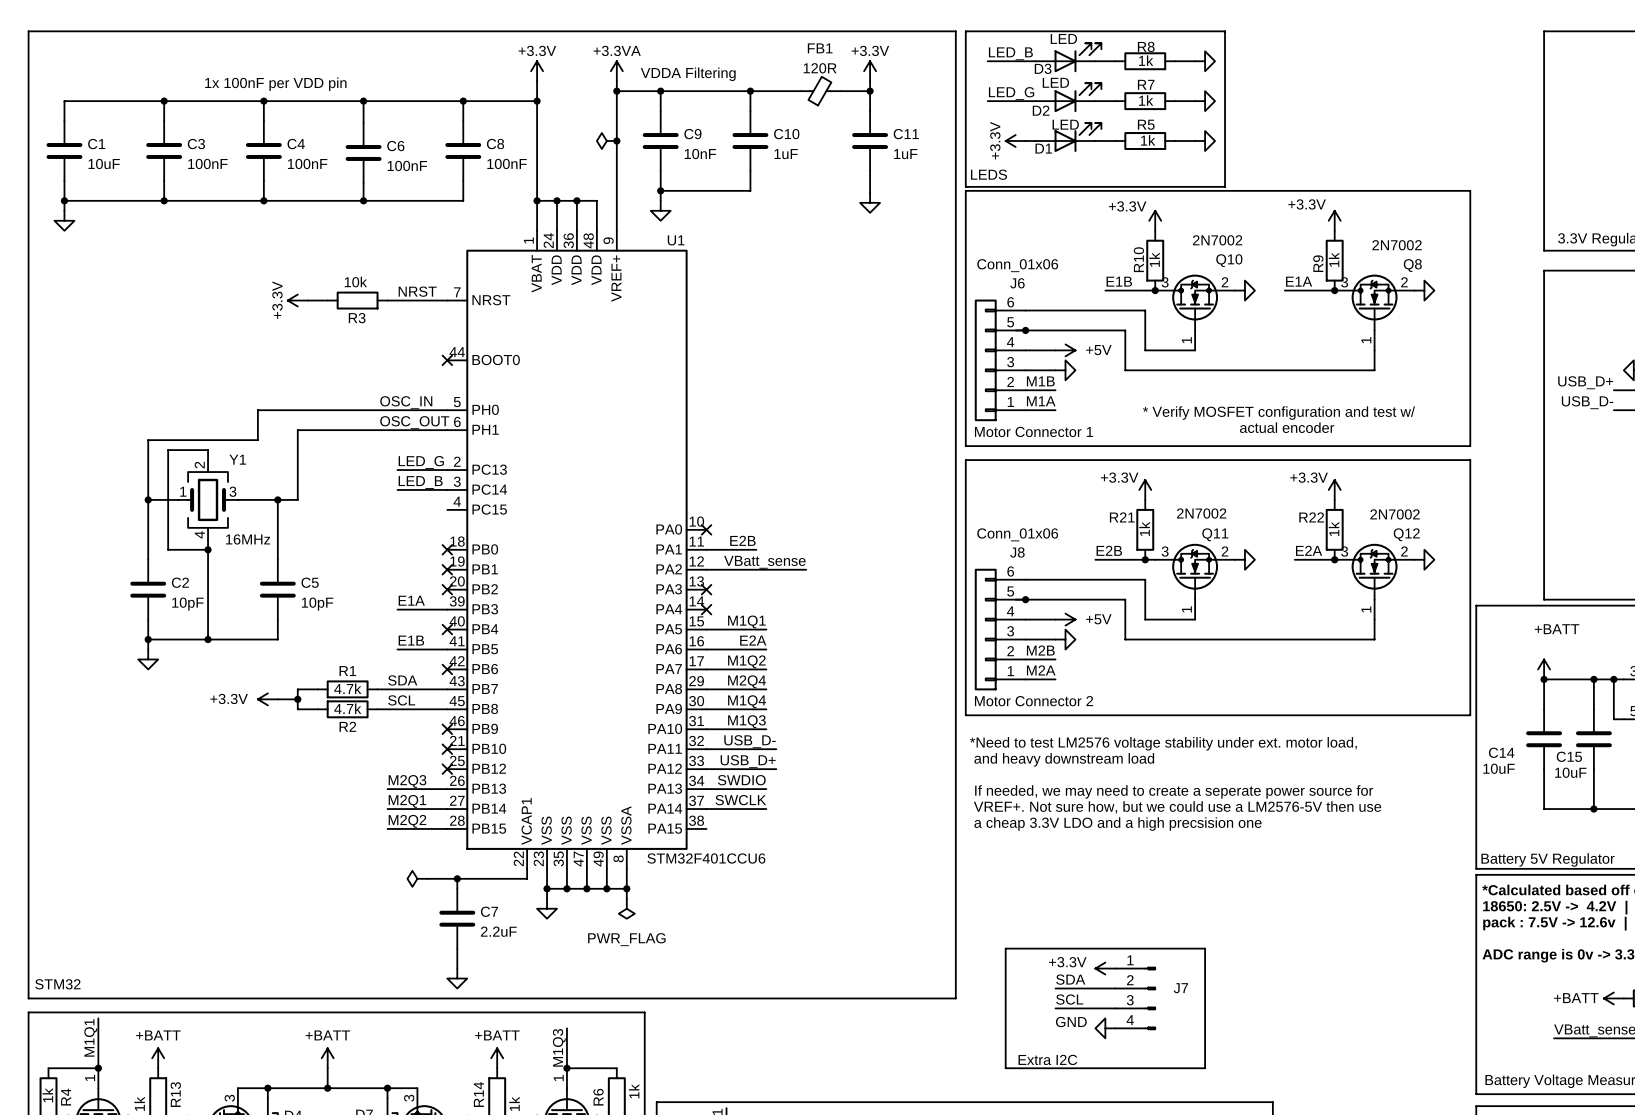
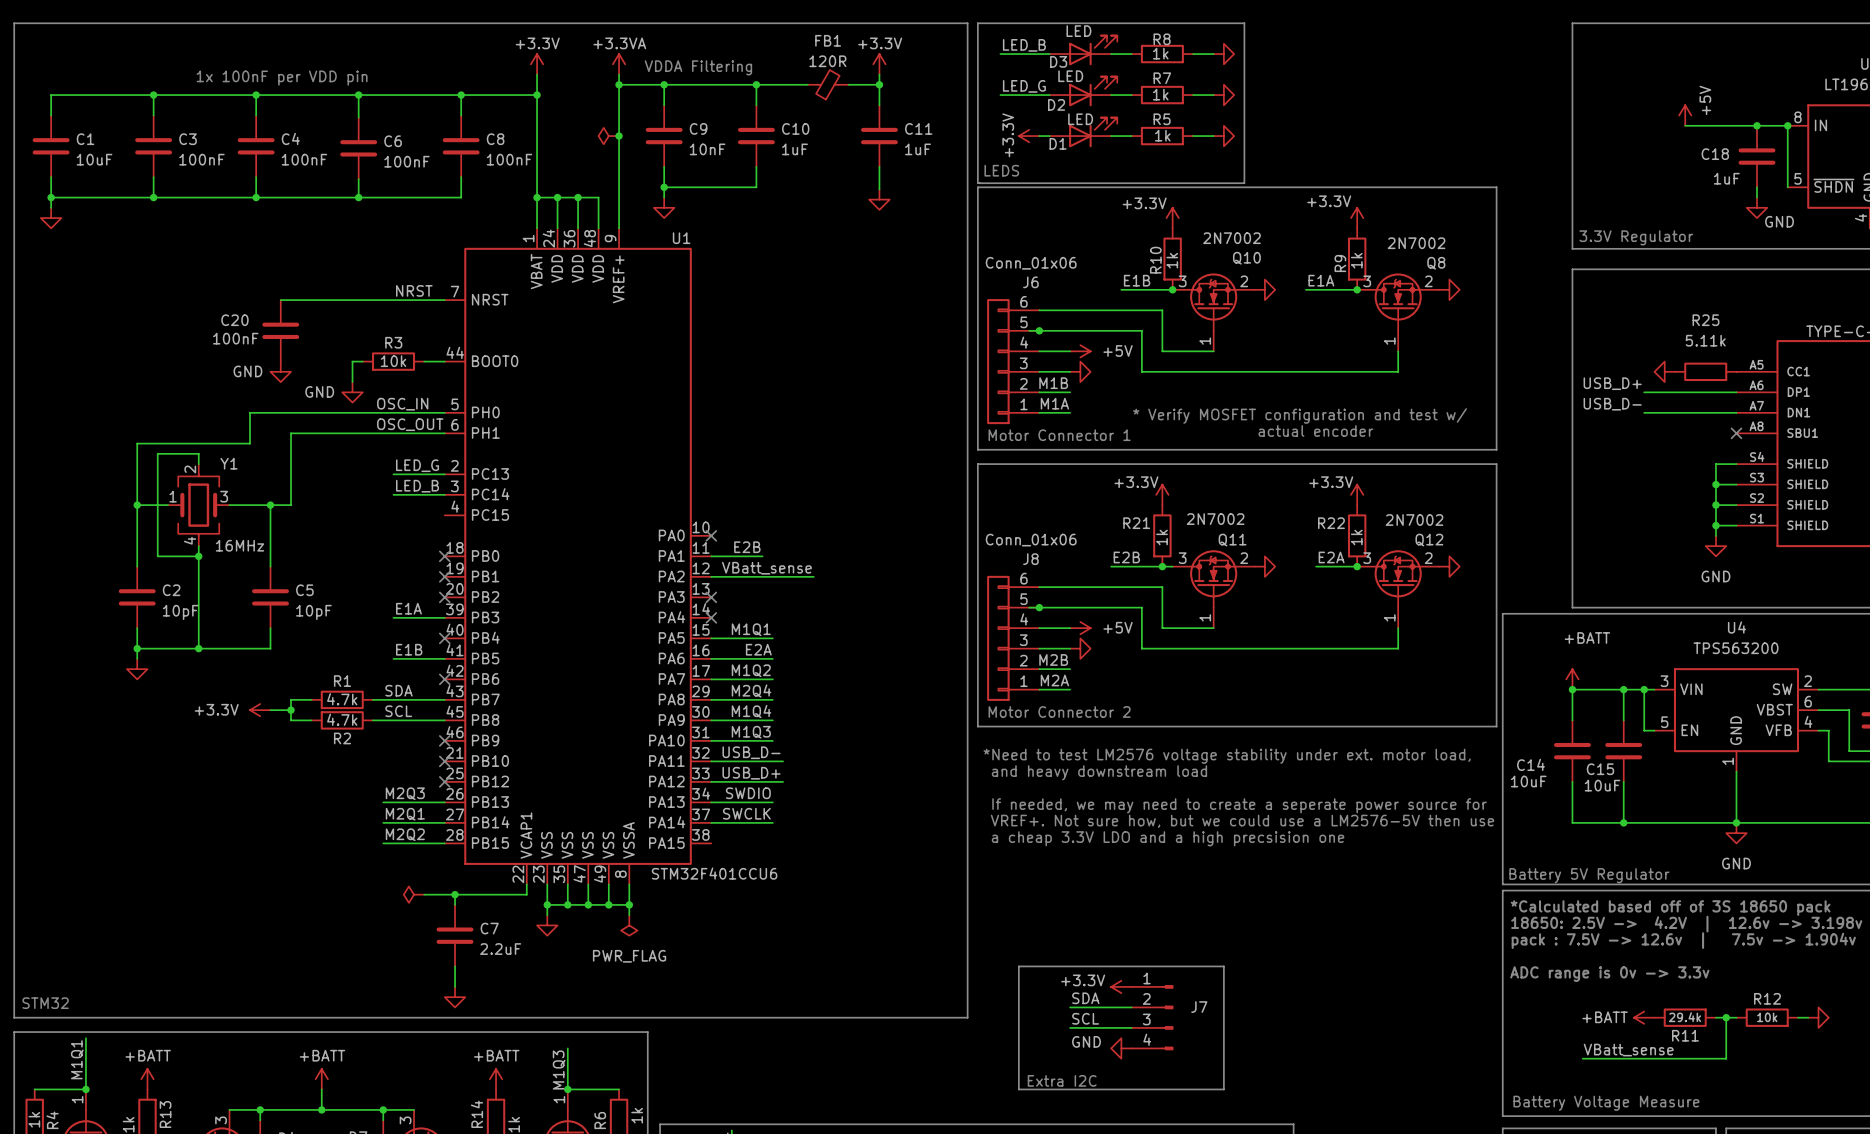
R3 value position: 10k (355, 282) -> 10k (393, 361)
power symbol: +3.3V (297, 300) -> none
wire: none -> (321, 300) (383, 300)
R3 position: (357, 300) -> (393, 361)
R3 name position: R3 (357, 318) -> R3 (393, 342)
C20: none -> 100nF (280, 330)
wire: none -> (362, 361) (352, 361) (352, 382)
wire: none -> (424, 361) (444, 361)
no-connect mark: (447, 360) -> none
power symbol: none -> GND (280, 371)
power symbol: none -> GND (352, 392)

